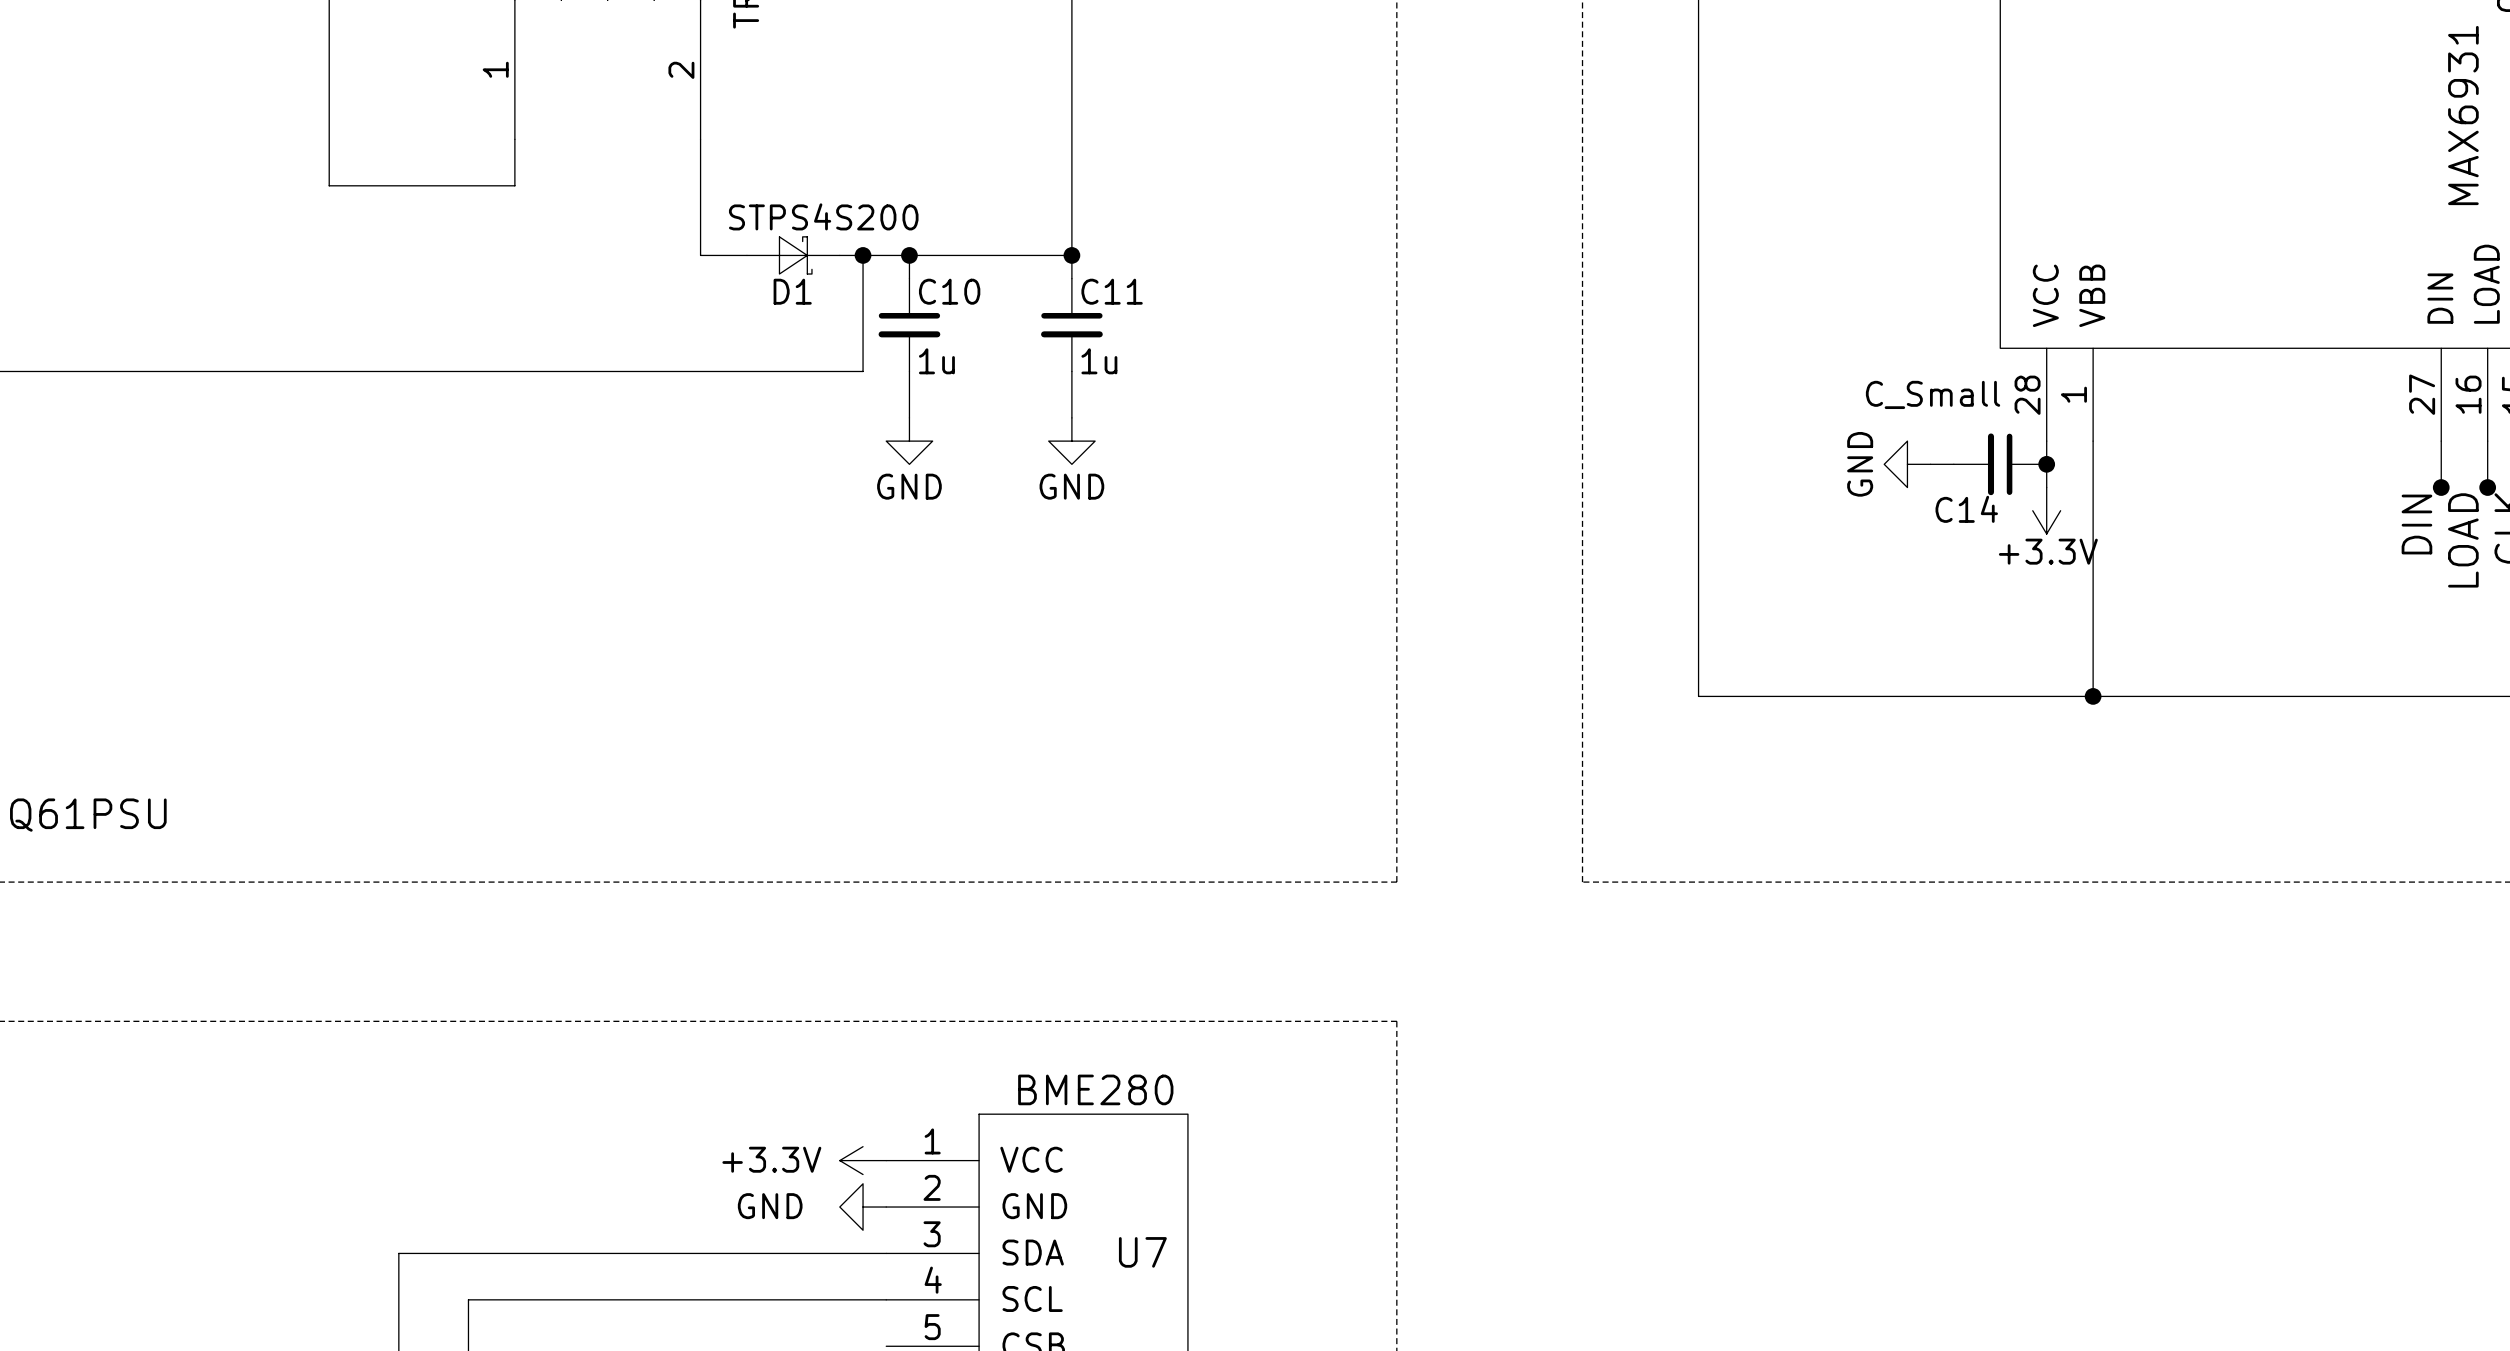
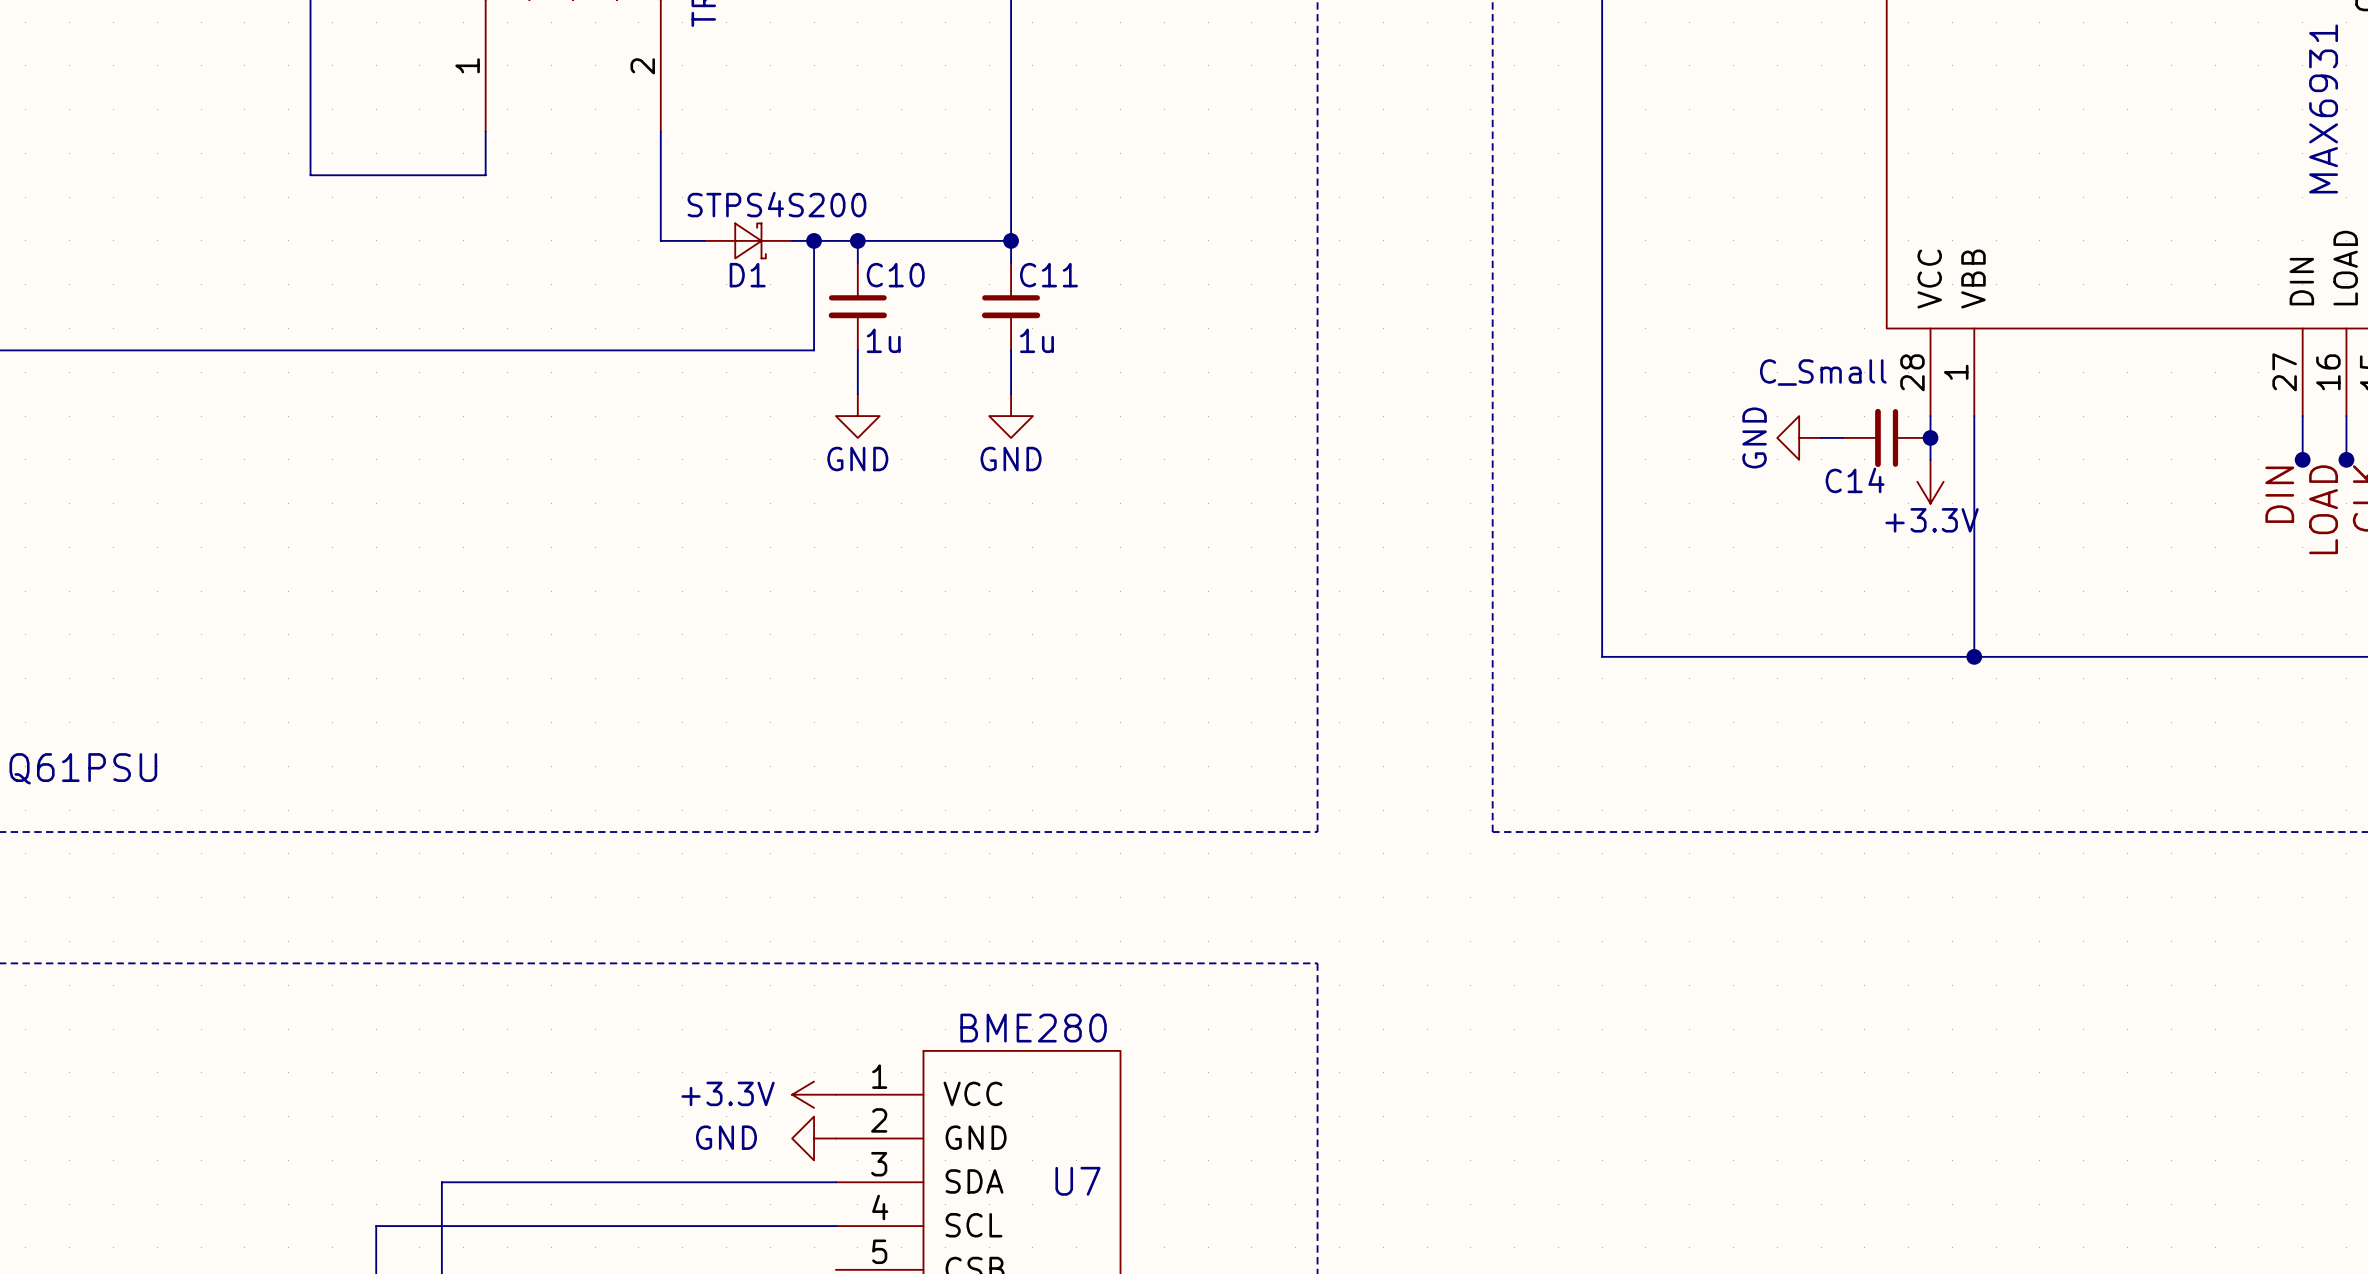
wire: (468, 1253) (398, 1253) (398, 1299) -> (441, 1182) (441, 1226) (376, 1226)

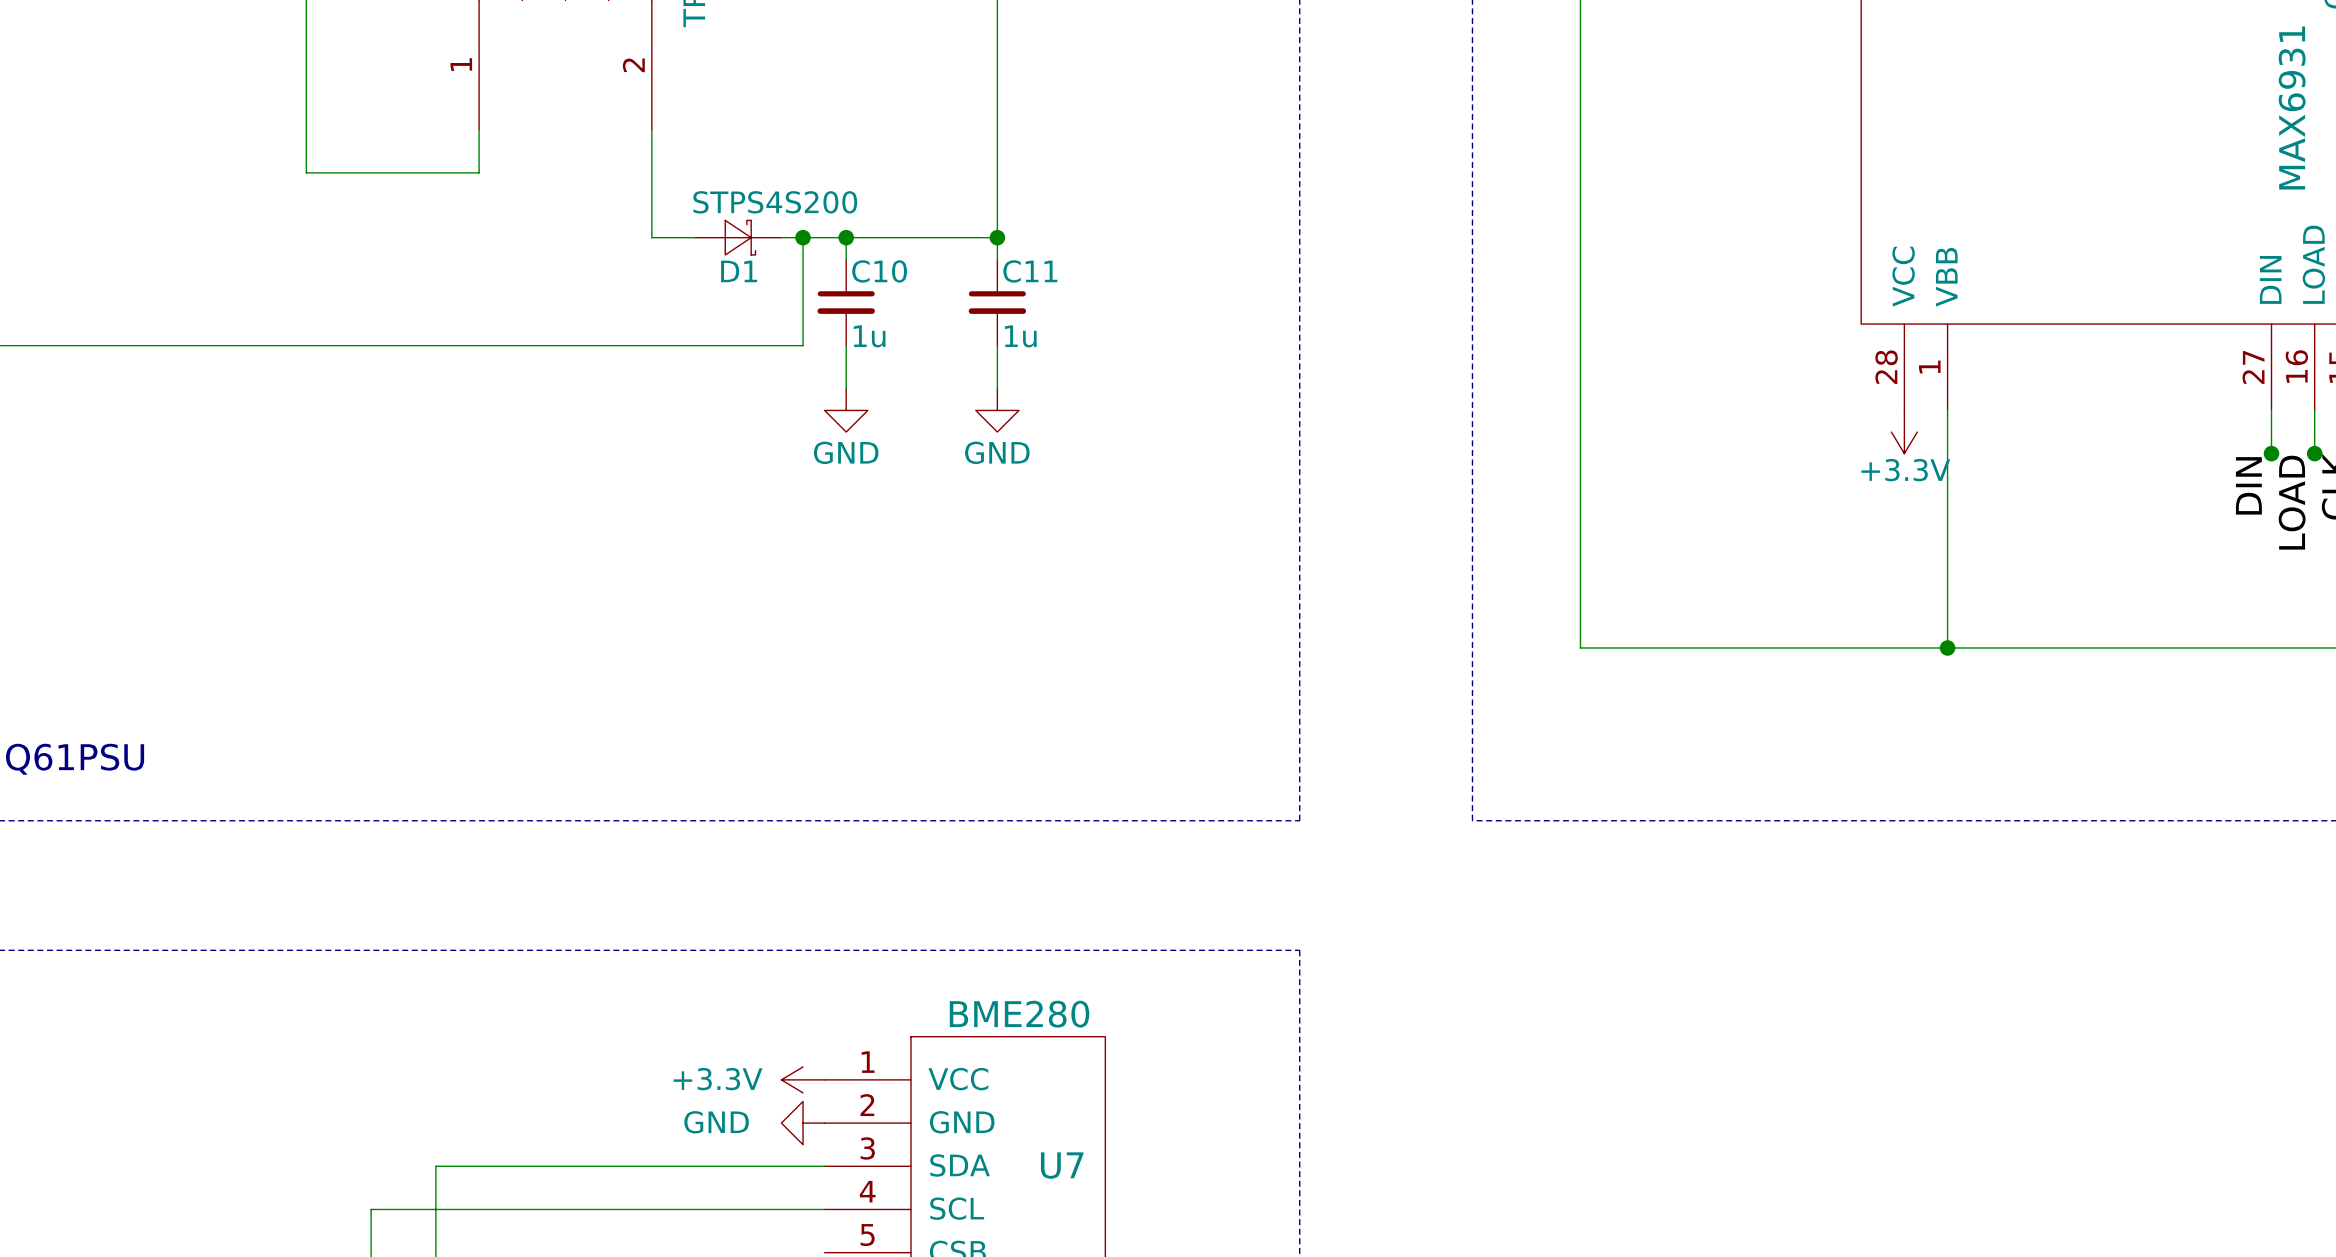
power symbol: GND (1799, 437) -> none
wire: (1821, 437) (1842, 437) -> none
C14: C_Small (1886, 437) -> none
junction: (1930, 437) -> none
power symbol position: +3.3V (1930, 481) -> +3.3V (1904, 432)

